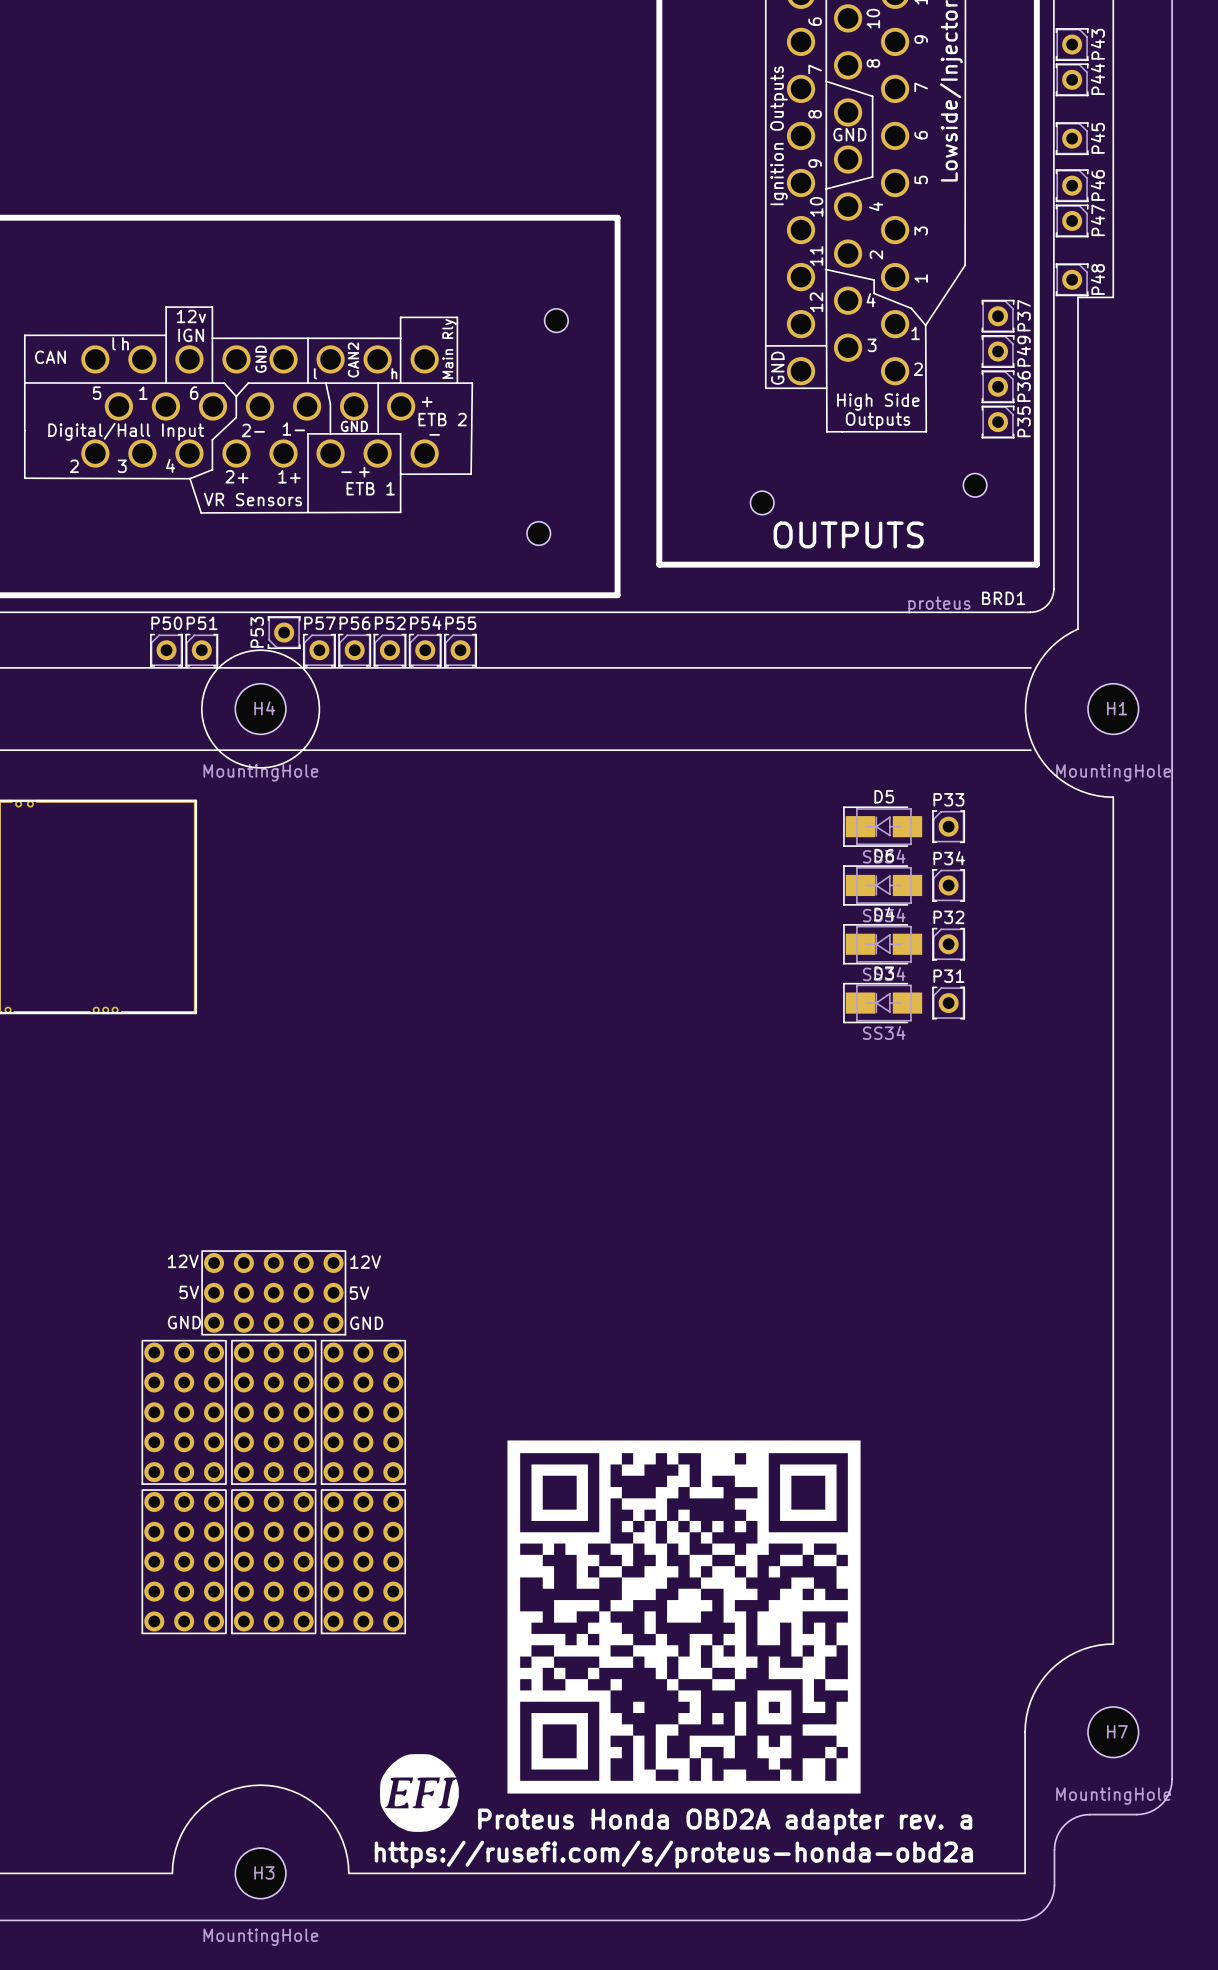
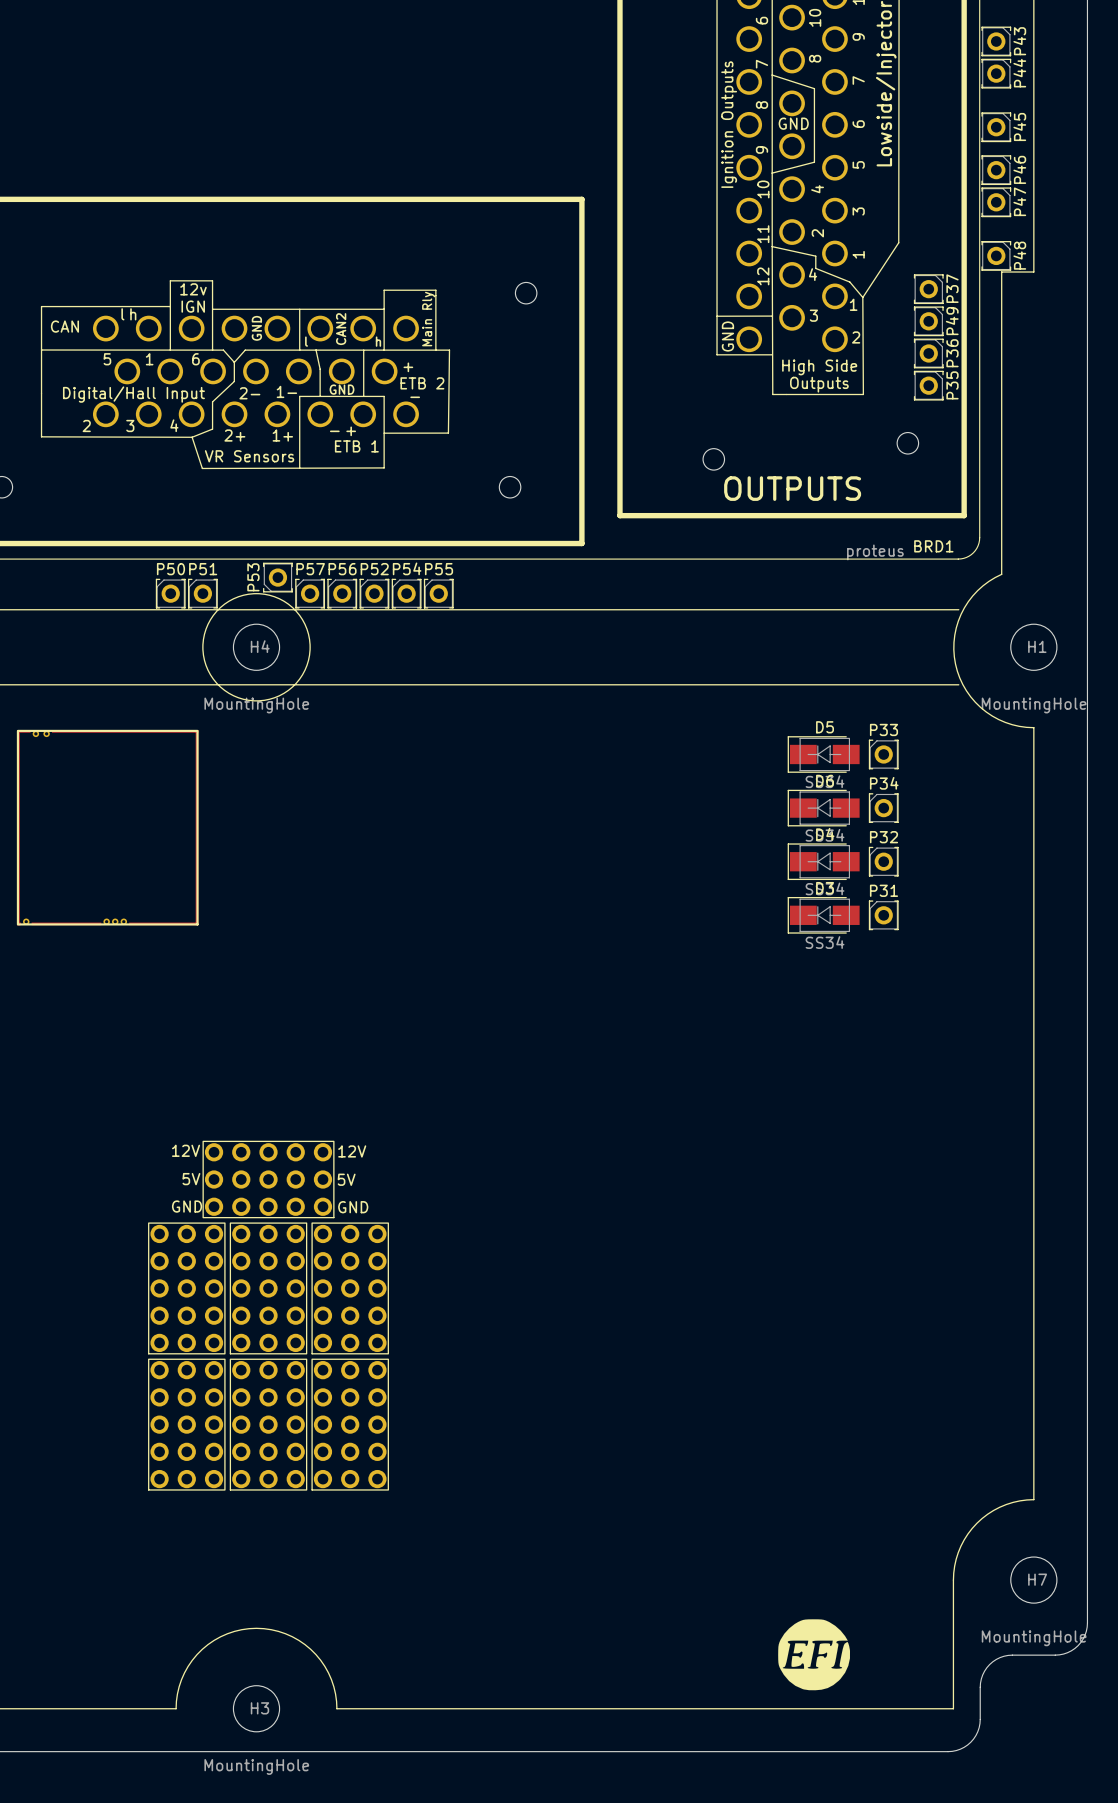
drawing: [507, 1440, 861, 1794] -> none
drawing: [380, 1754, 459, 1832] -> none
drawing: none -> [778, 1619, 851, 1691]
text: Proteus Honda OBD2A adapter rev. a (725, 1822) -> none
text: https://rusefi.com/s/proteus-honda-obd2a (673, 1854) -> none

